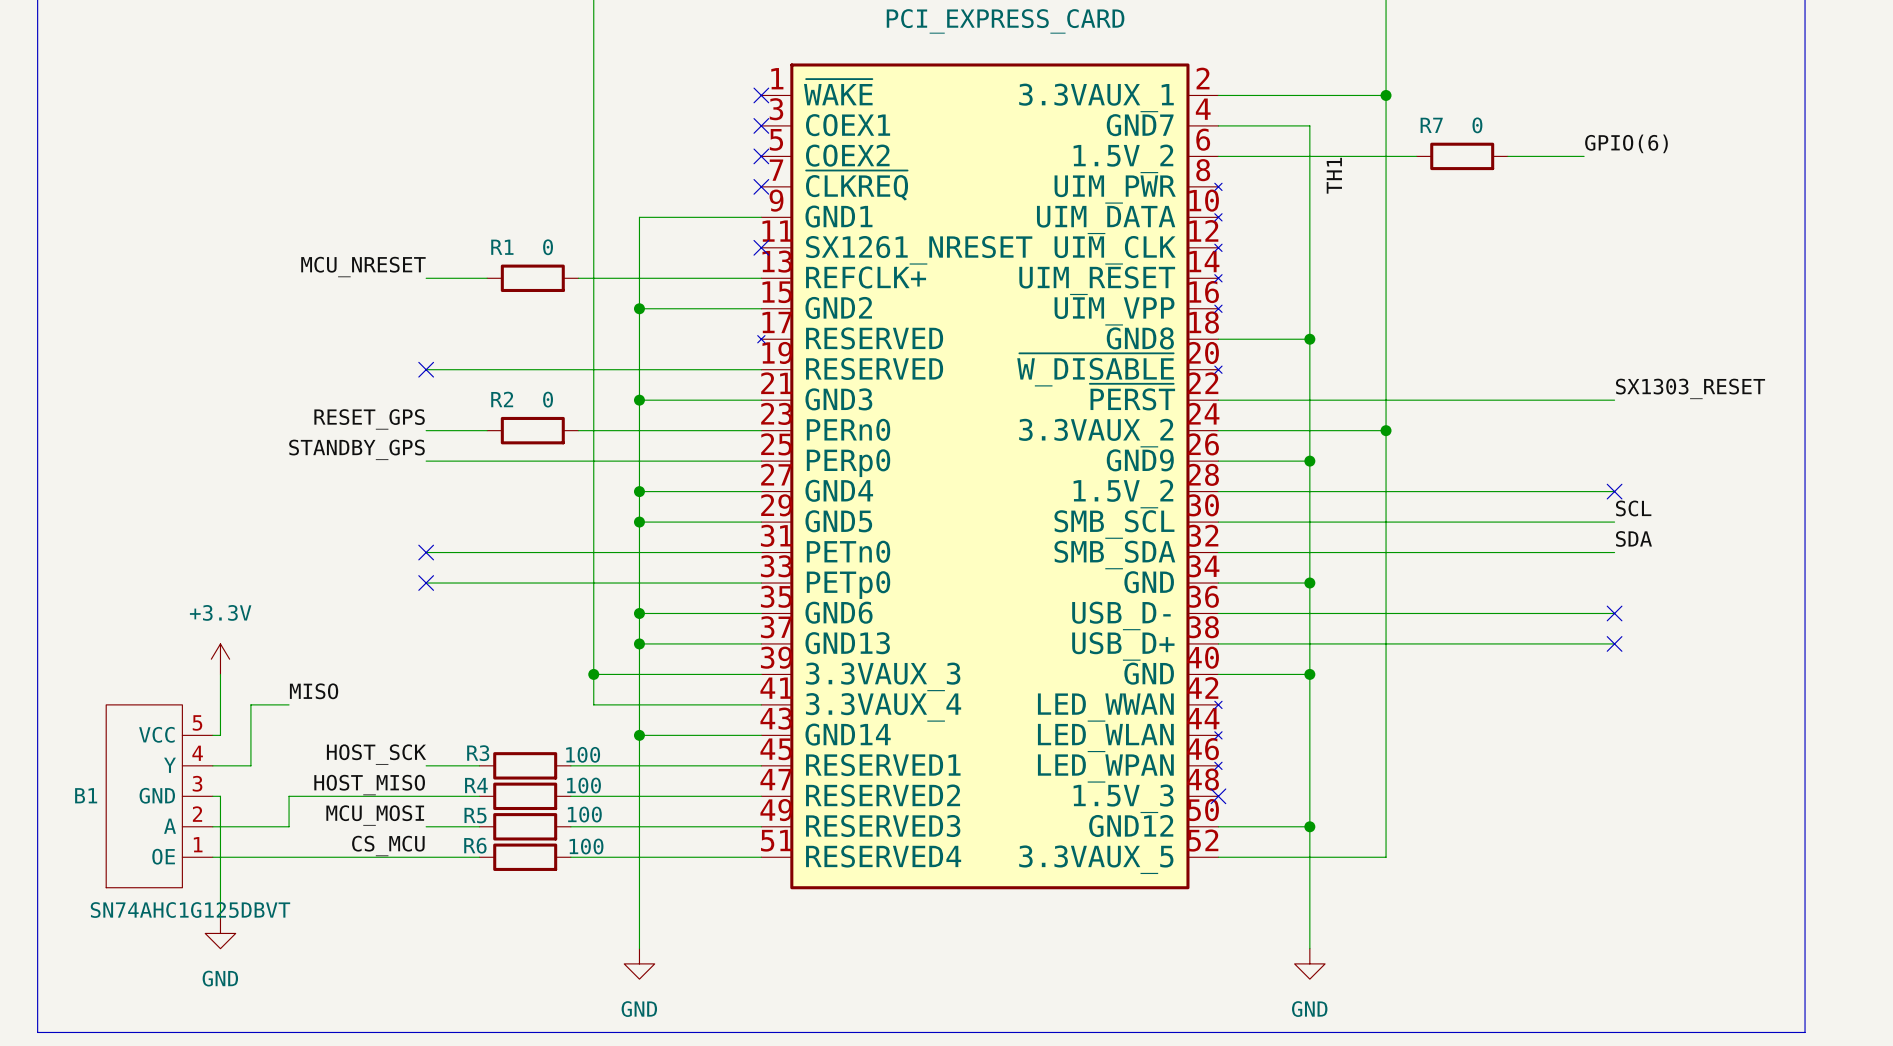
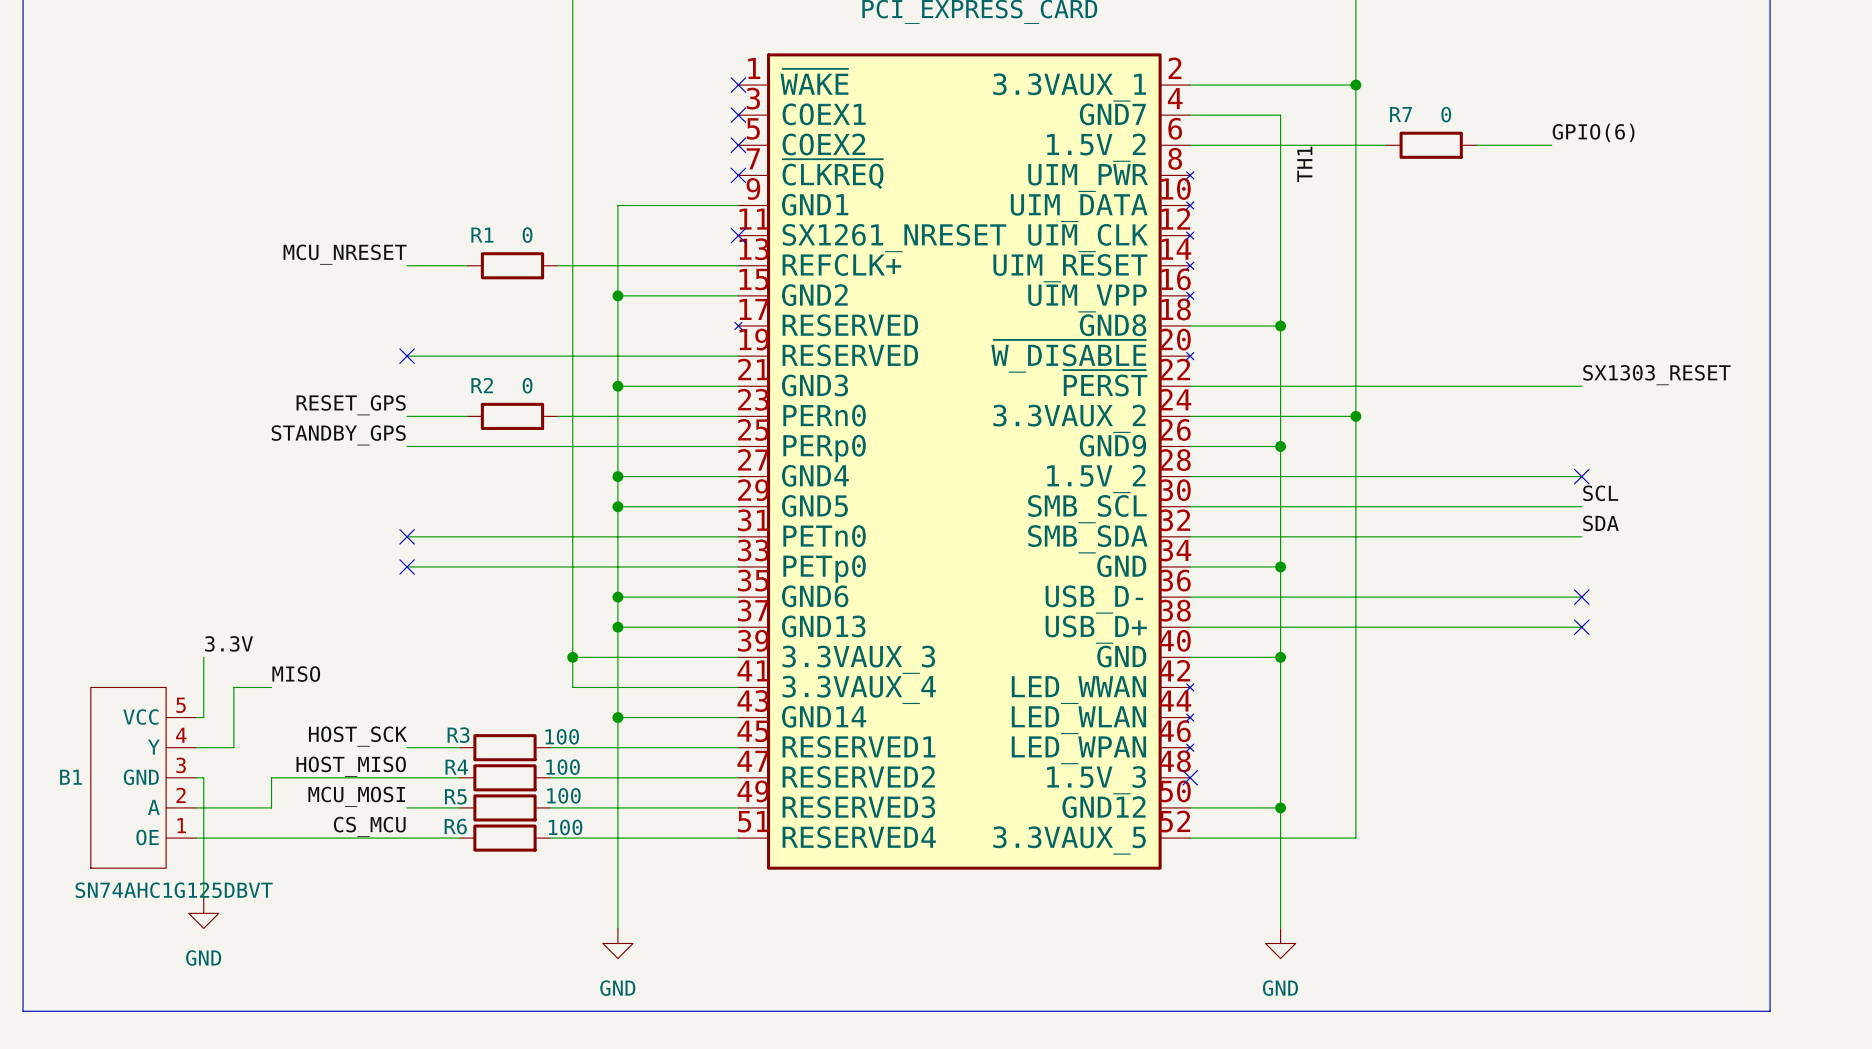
power symbol: +3.3V (220, 659) -> none
label: none -> 3.3V (229, 643)

